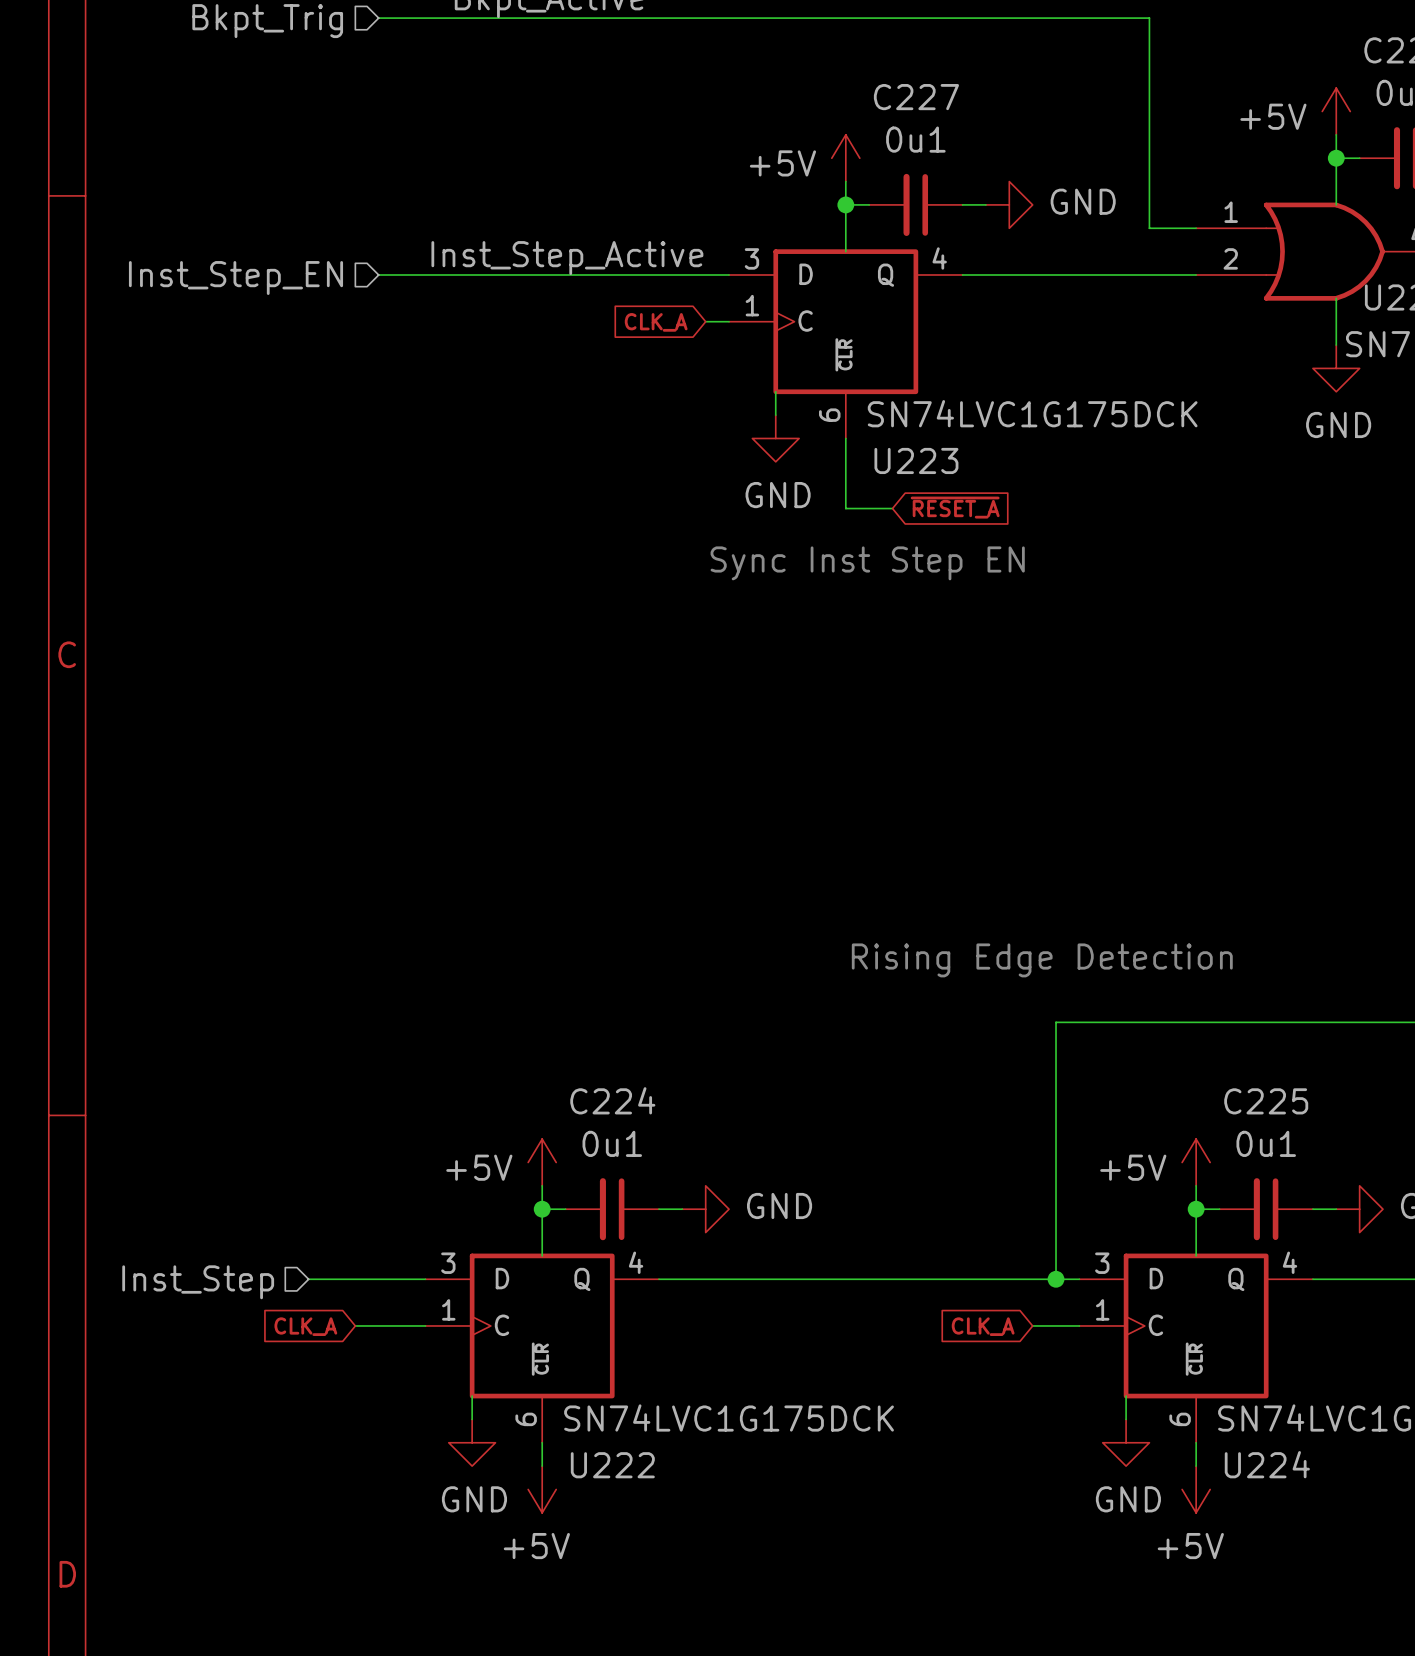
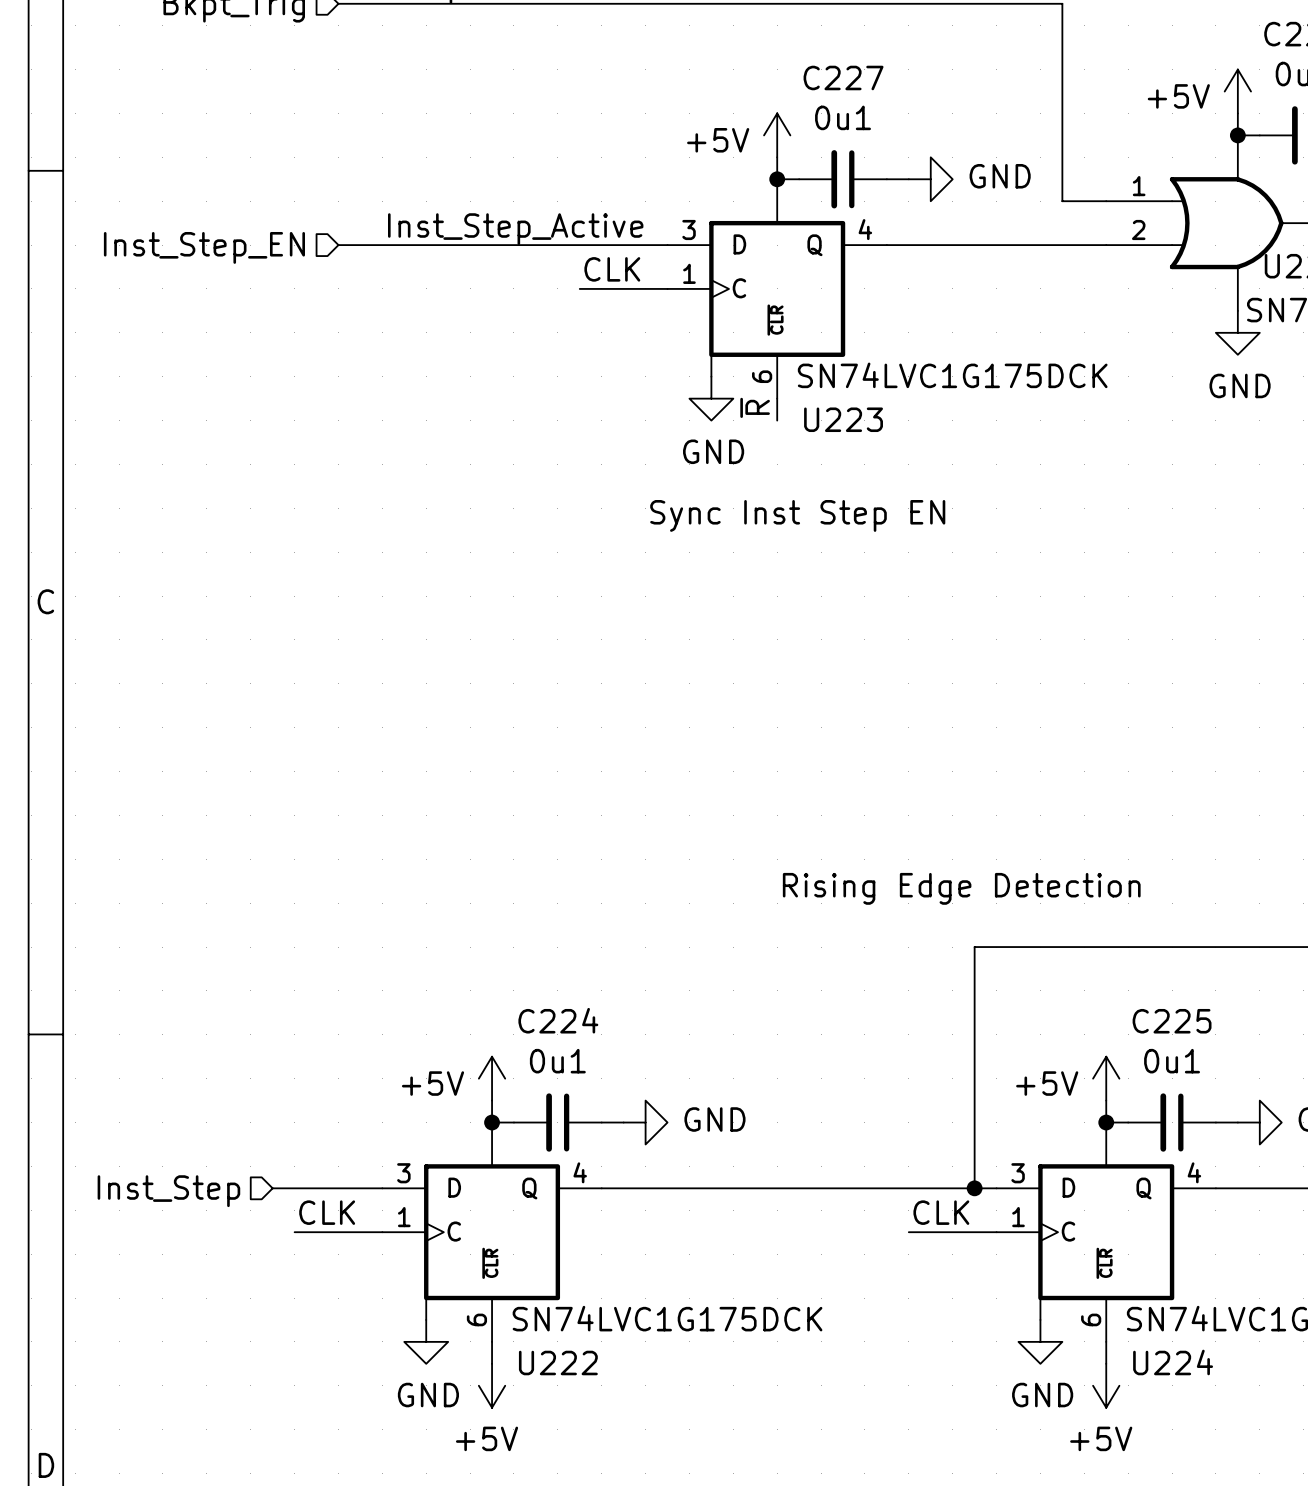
label: none -> CLK (612, 269)
wire: none -> (579, 288) (645, 288)
global label: CLK_A (656, 322) -> none
label: none -> ~{R} (755, 407)
wire: (845, 461) (845, 508) (892, 508) -> none
global label: ~{RESET_A} (955, 507) -> none
label: none -> CLK (327, 1212)
label: none -> CLK (941, 1212)
wire: none -> (294, 1232) (316, 1232)
wire: none -> (908, 1232) (952, 1232)
global label: CLK_A (305, 1326) -> none
global label: CLK_A (983, 1326) -> none

